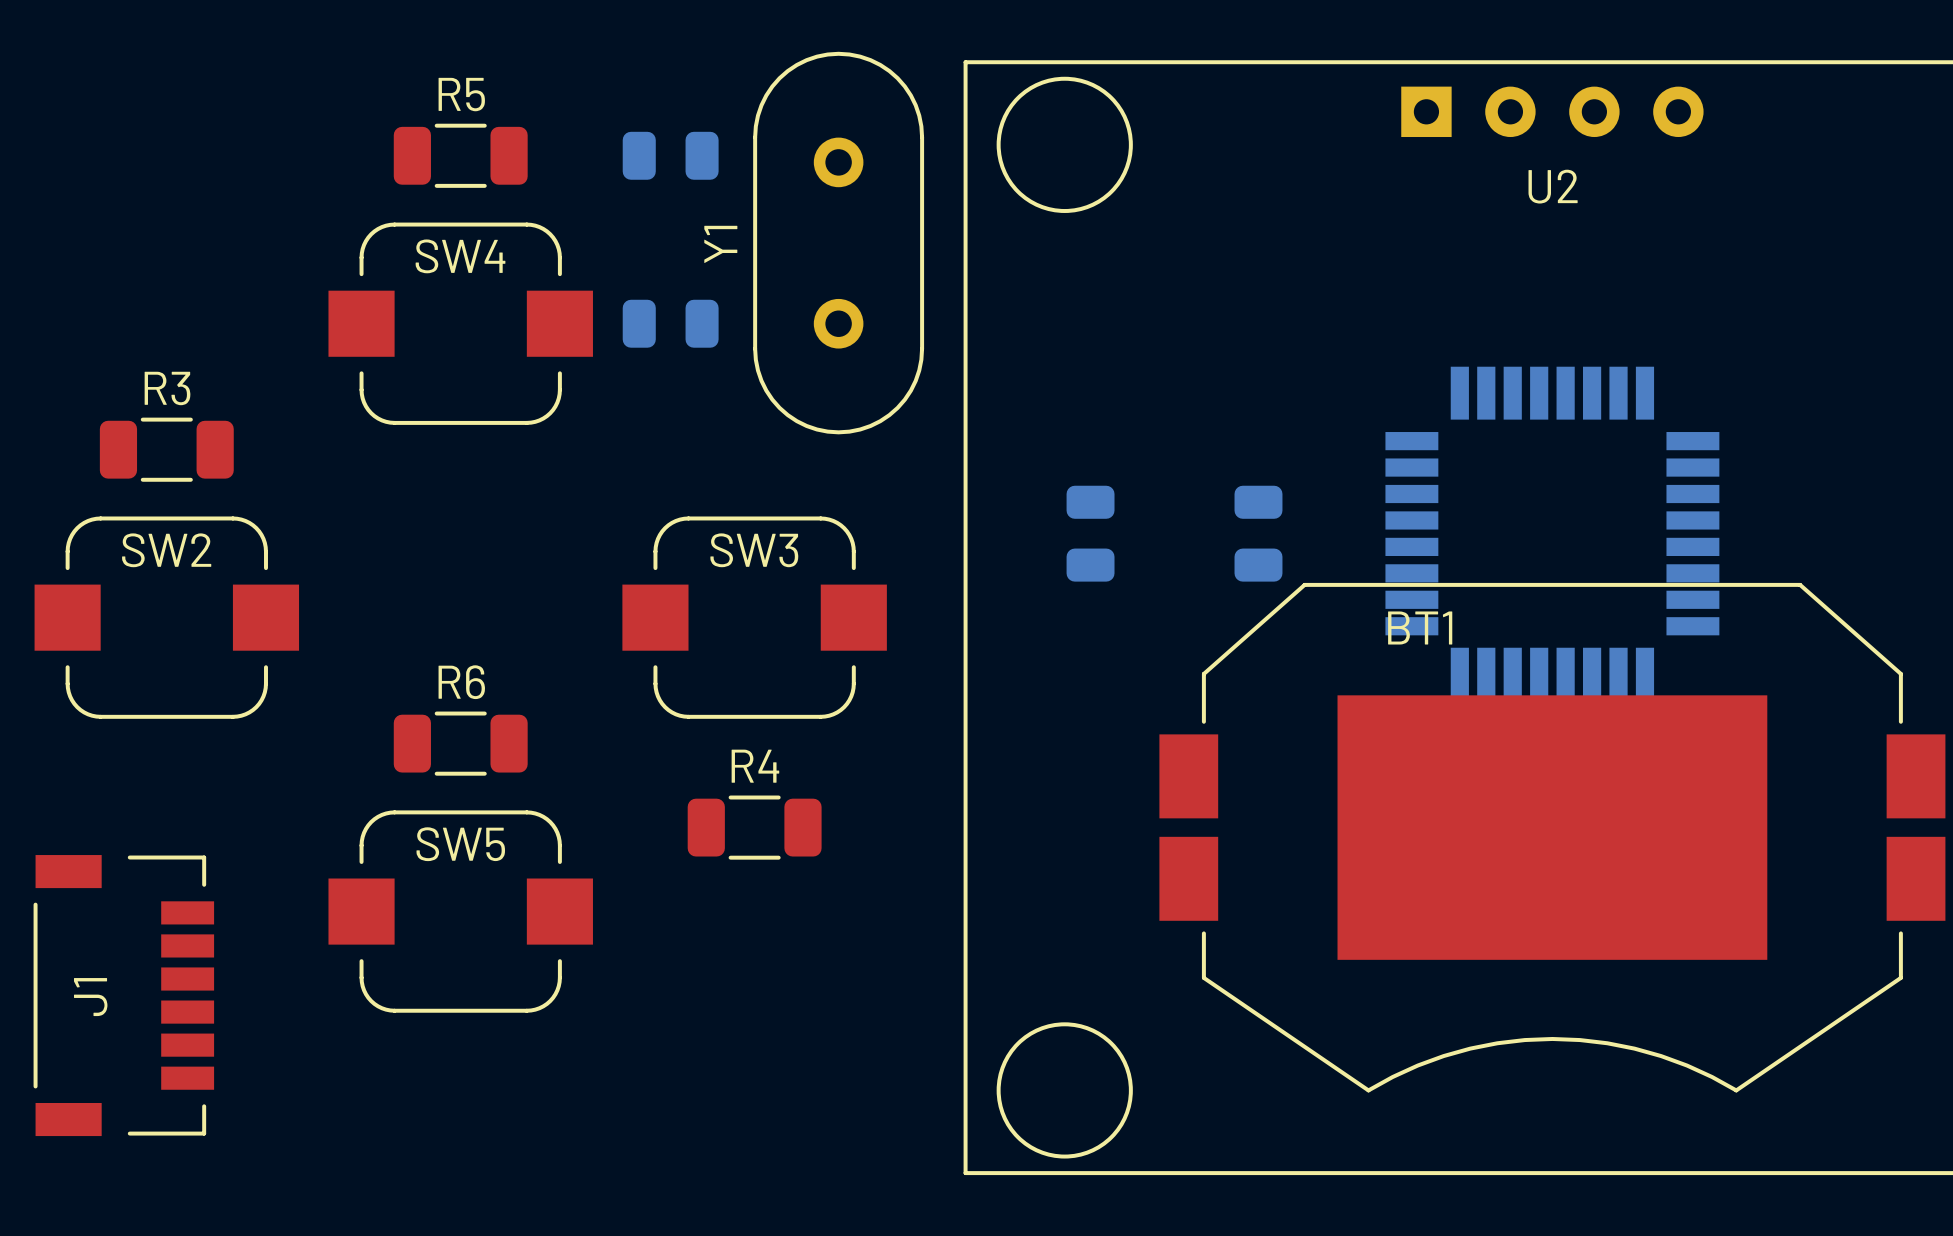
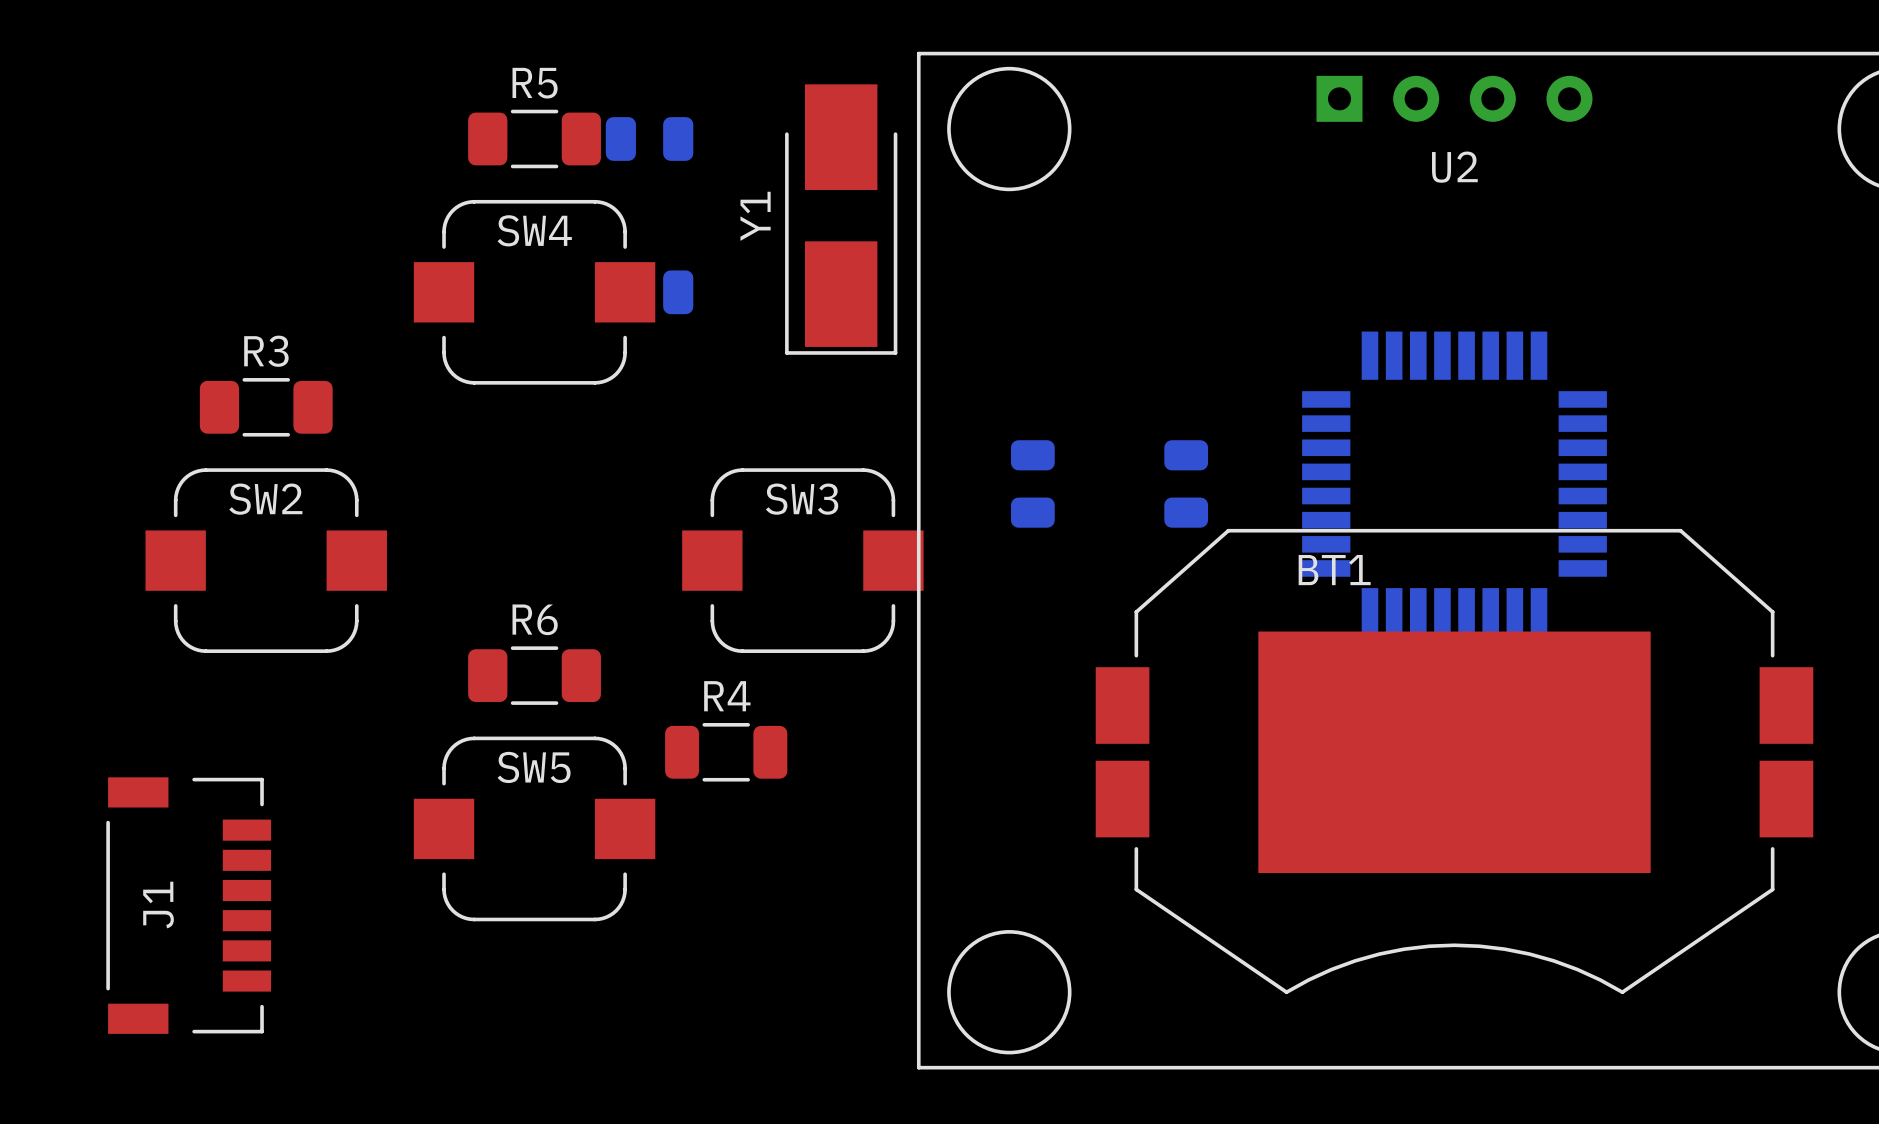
Y1 footprint: [753, 51, 925, 435] -> [785, 84, 898, 355]
R5 footprint: [393, 123, 528, 188] -> [468, 109, 601, 169]
SW4 position: (460, 323) -> (534, 292)
R3 footprint: [99, 417, 234, 482] -> [199, 378, 333, 437]
SW2 position: (166, 617) -> (266, 560)
SW3 position: (754, 617) -> (802, 560)
R6 footprint: [393, 711, 528, 776] -> [468, 646, 601, 705]
SW5 position: (460, 911) -> (534, 828)
J1 position: (123, 995) -> (188, 905)

